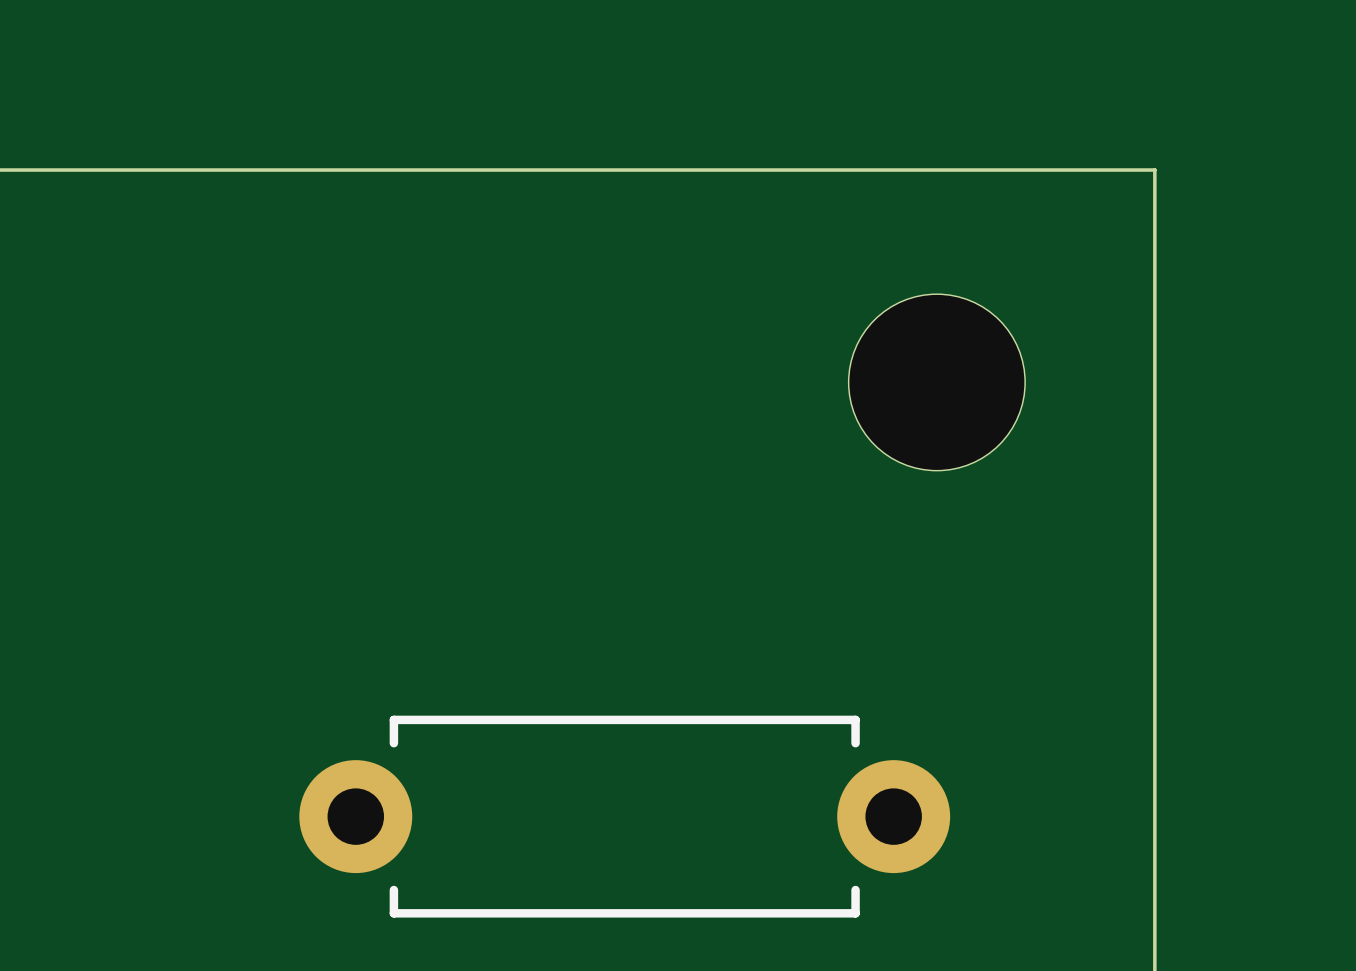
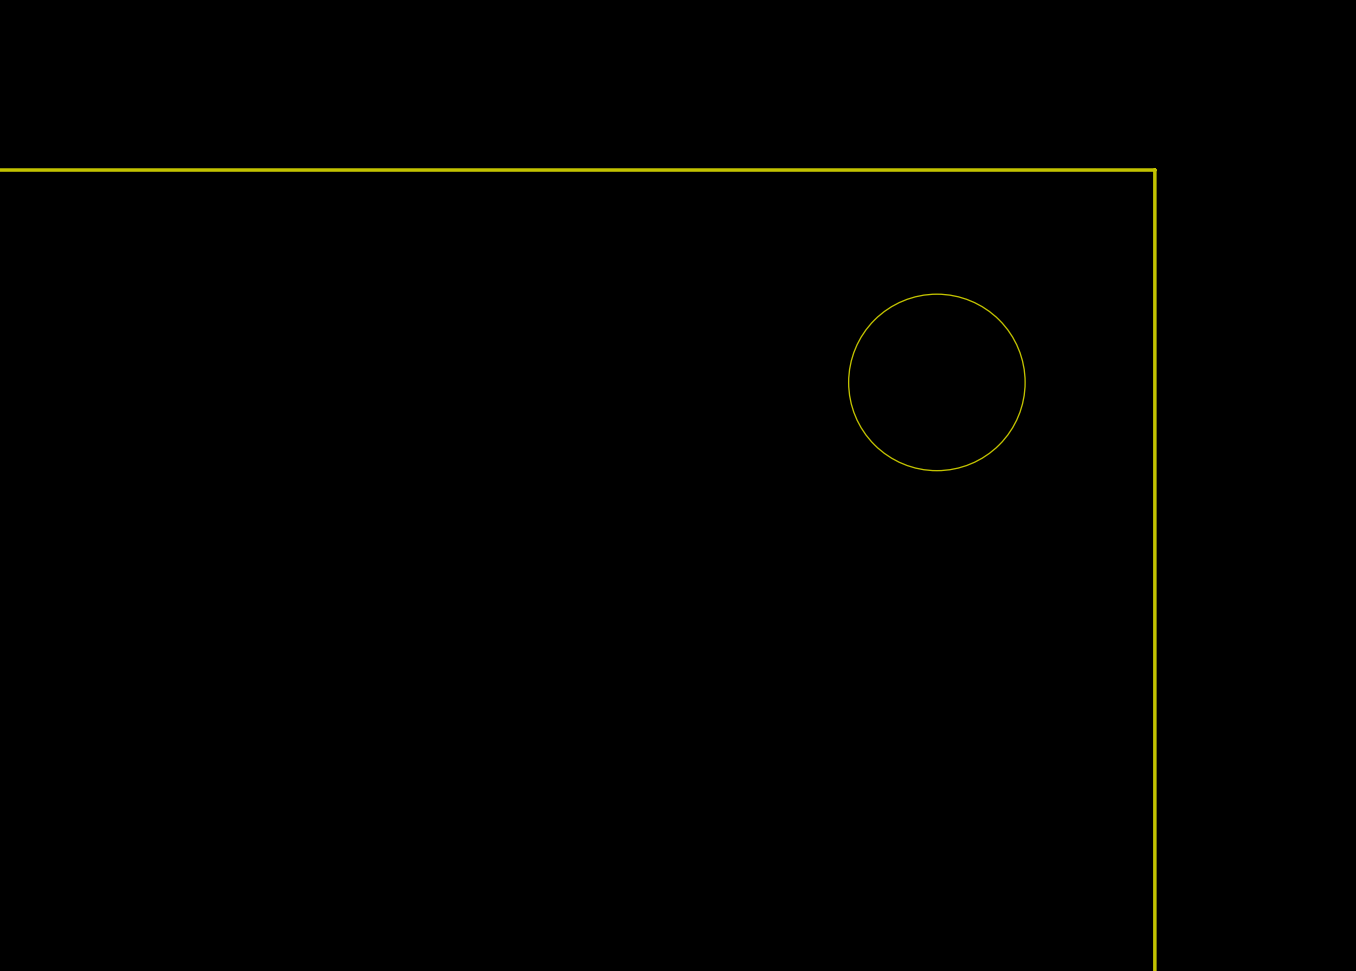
part: (624, 816) -> none

